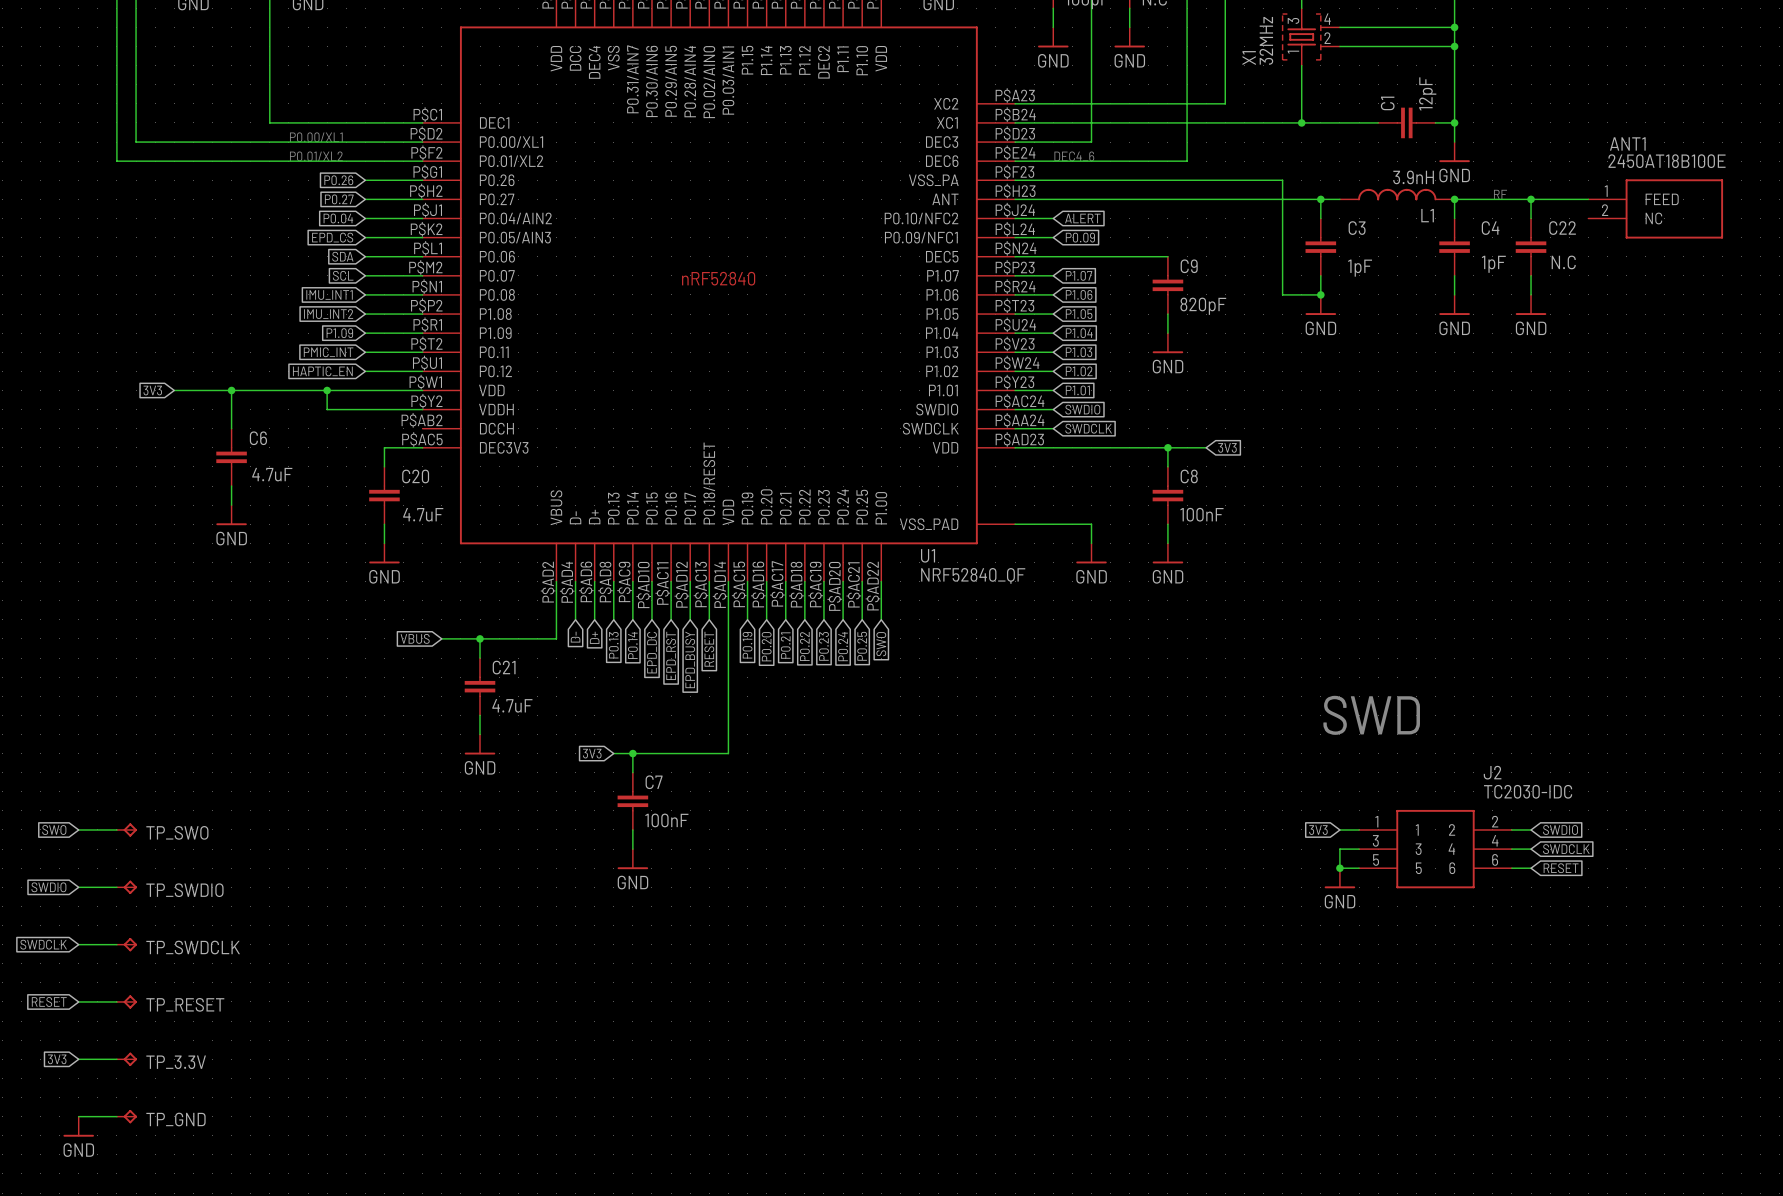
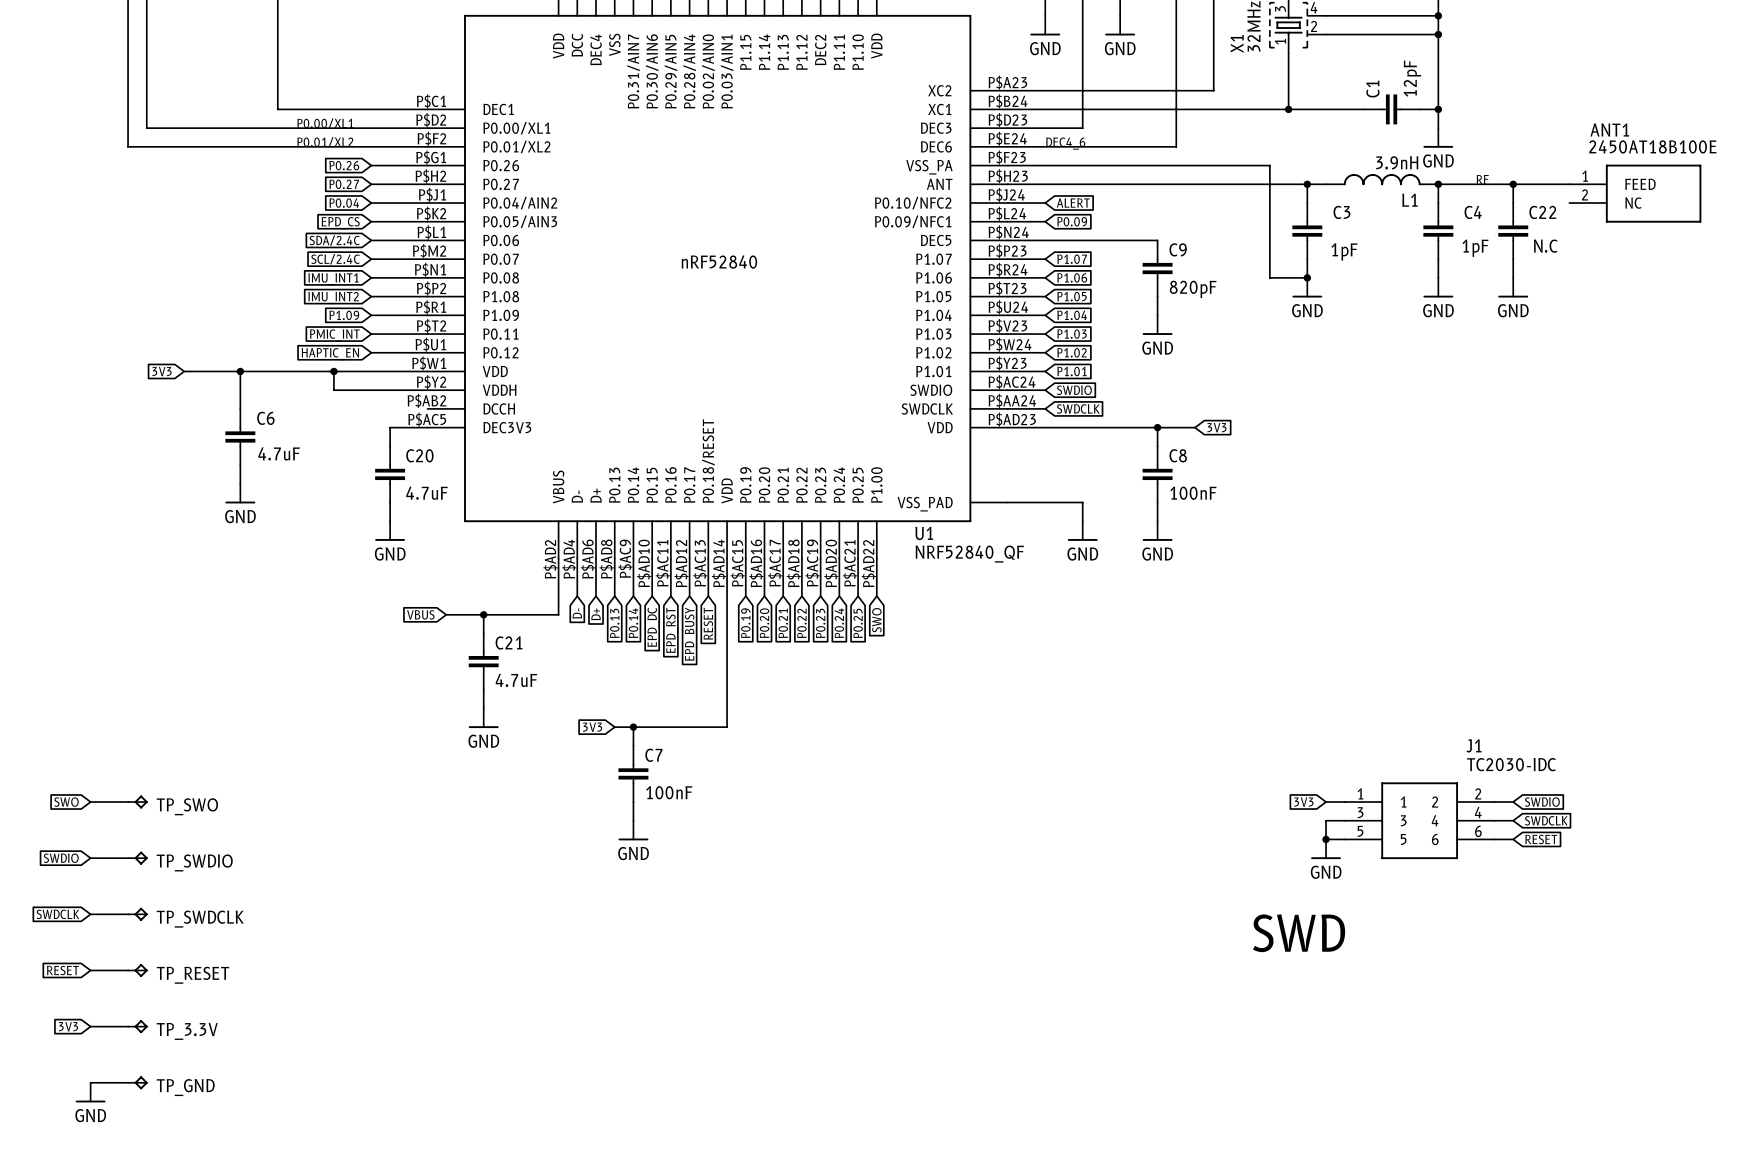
global label: SDA (342, 256) -> SDA/2.4C (334, 240)
global label: SCL (343, 275) -> SCL/2.4C (335, 259)
text: SWD (1371, 715) -> none
J2 name: J2 (1492, 772) -> J1 (1474, 745)
text: none -> SWD (1299, 933)

